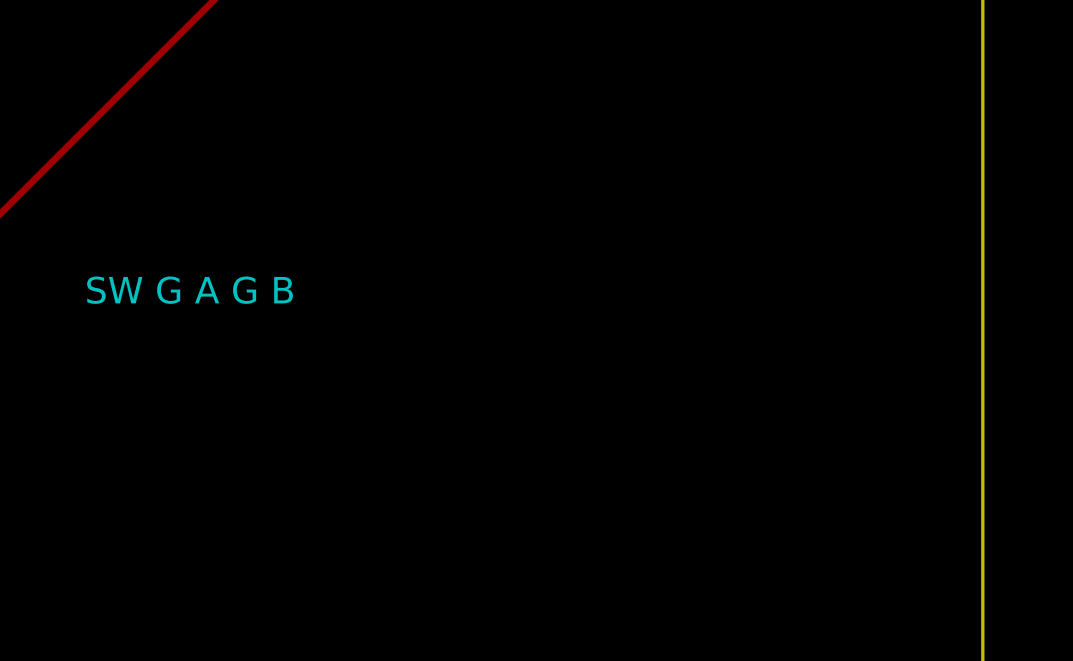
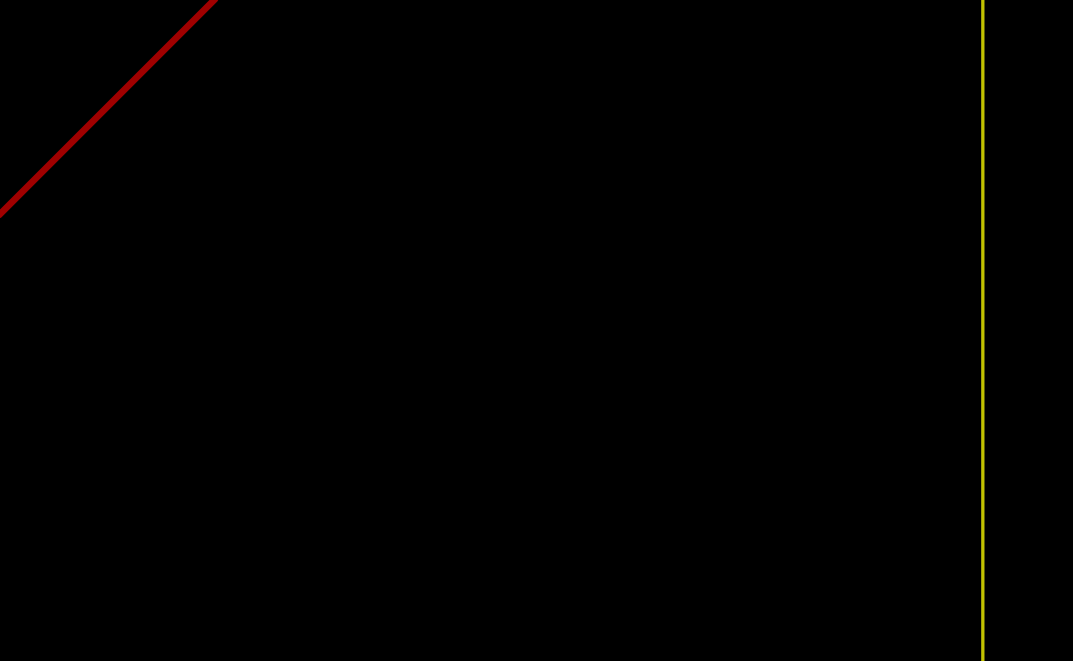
text: SW G A G B (190, 290) -> none

